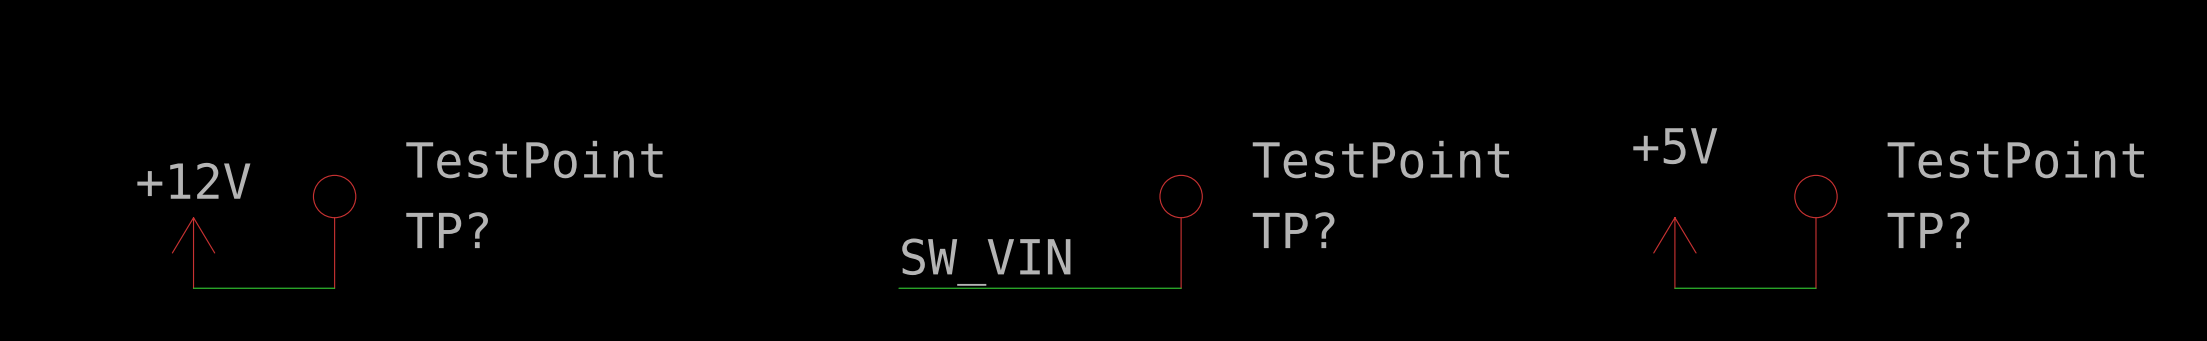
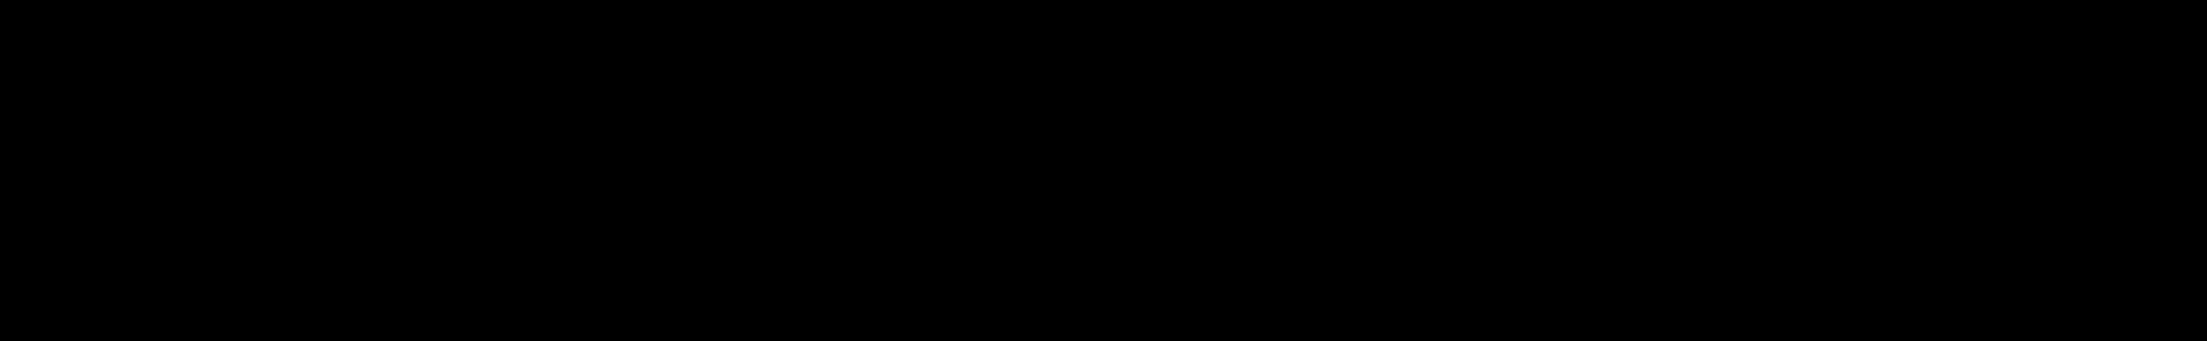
TP?: TestPoint (334, 231) -> none
TP?: TestPoint (1181, 231) -> none
TP?: TestPoint (1815, 231) -> none
power symbol: +12V (193, 252) -> none
power symbol: +5V (1674, 252) -> none
label: SW_VIN (986, 262) -> none
wire: (193, 288) (334, 288) -> none
wire: (898, 288) (1181, 288) -> none
wire: (1674, 288) (1815, 288) -> none

